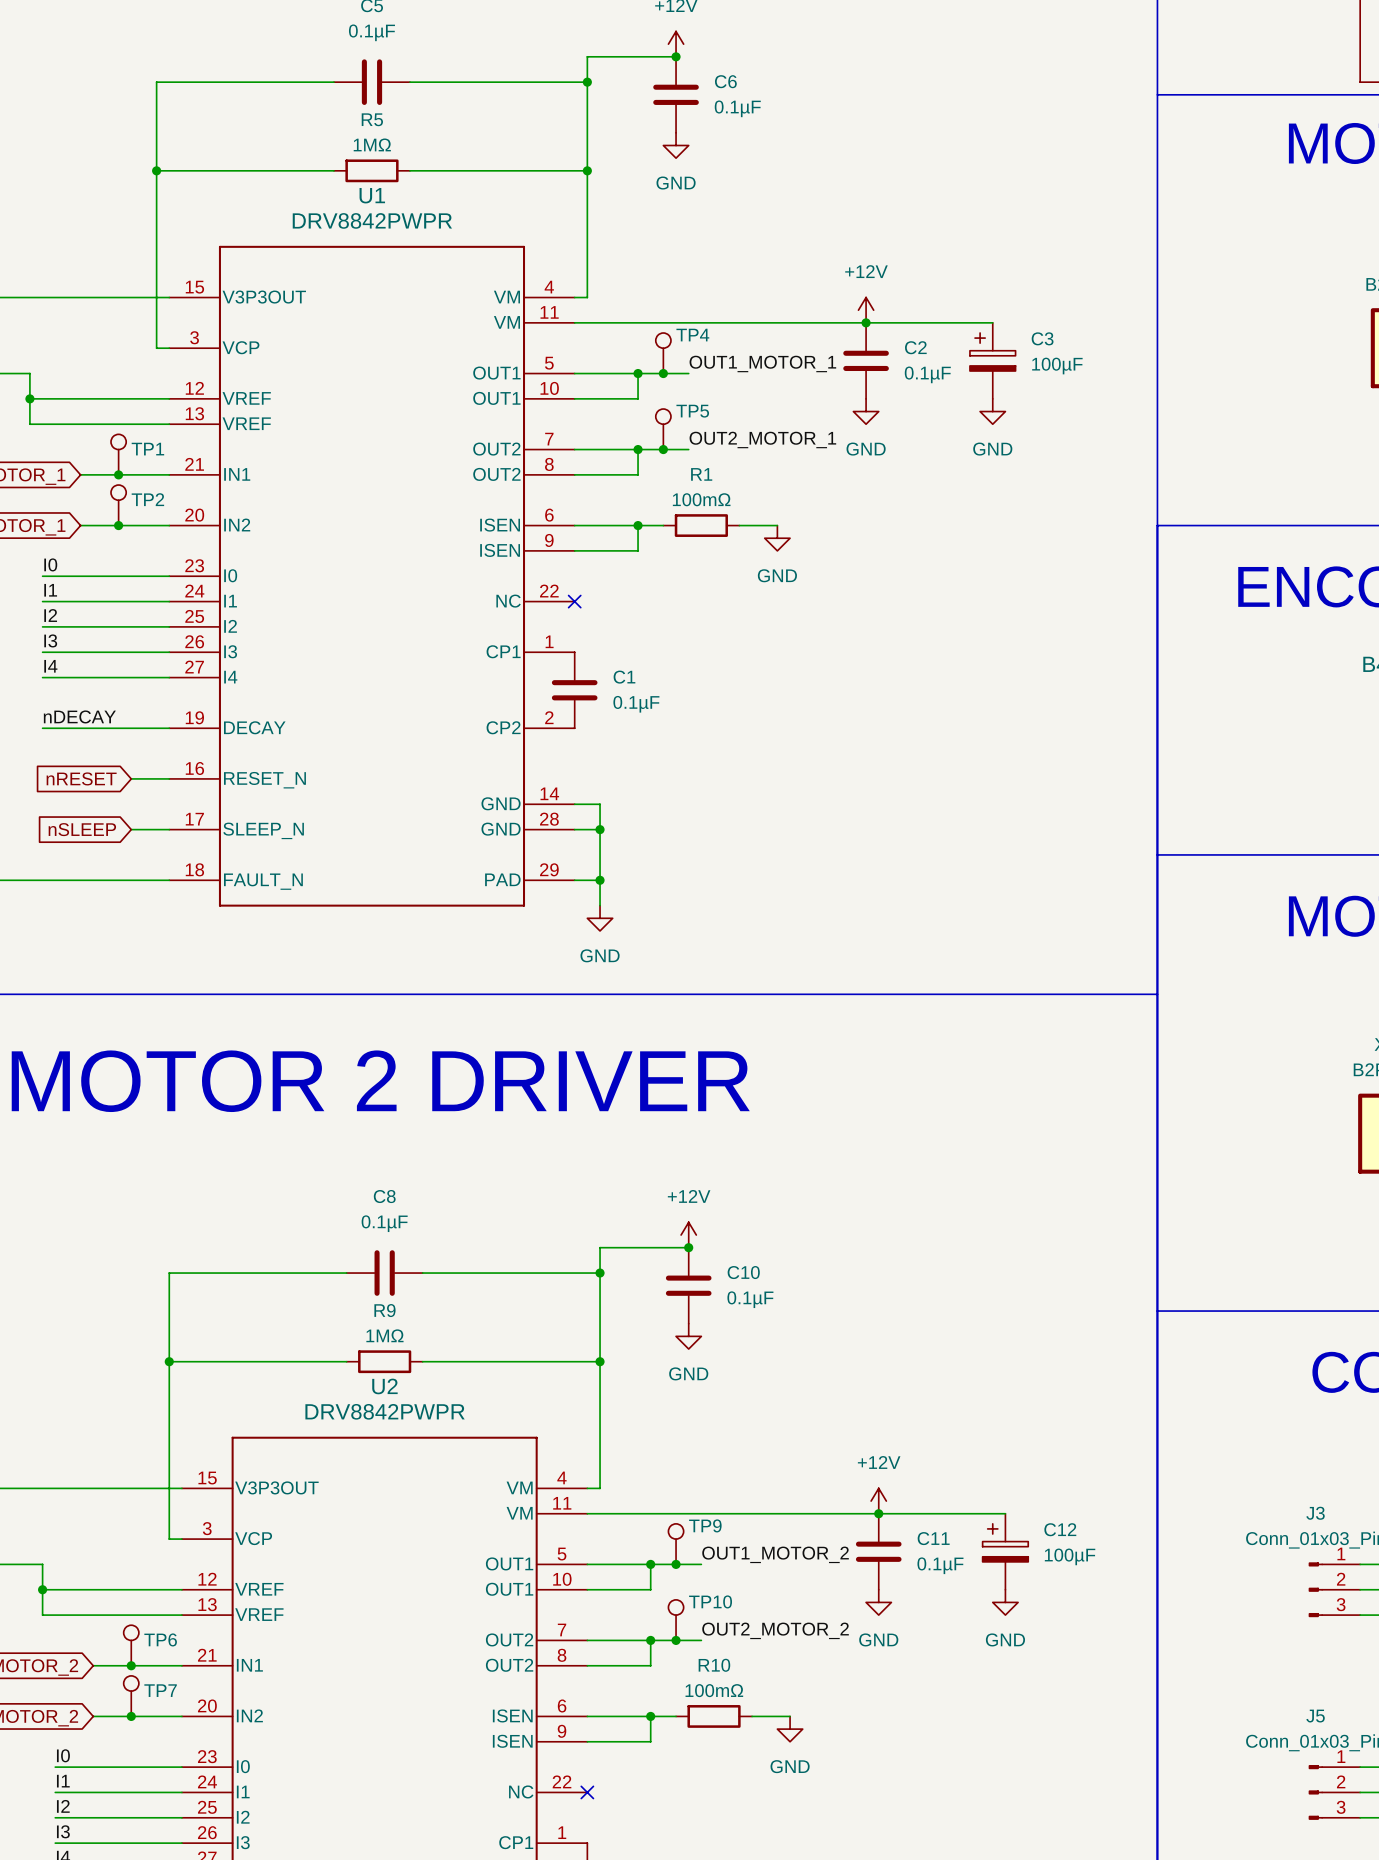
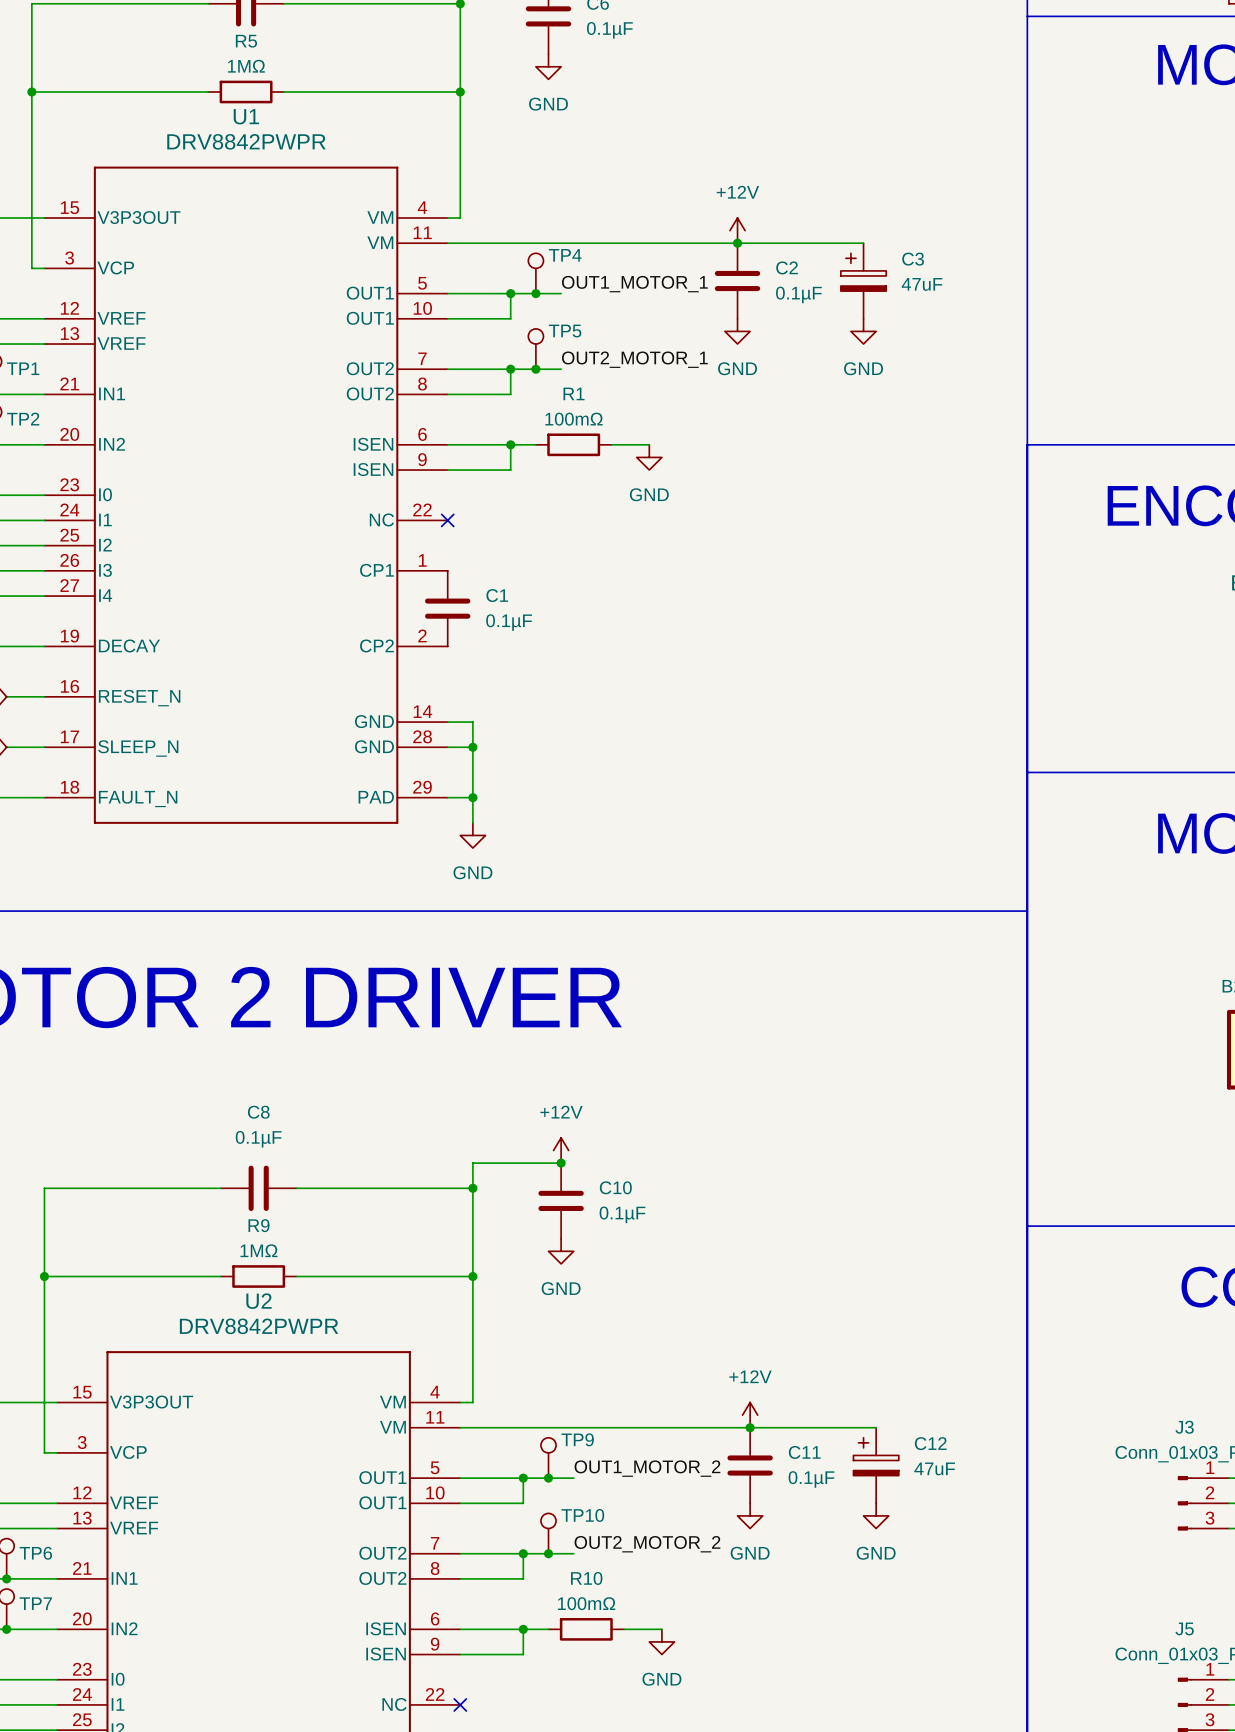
C3 value: 100µF (1057, 366) -> 47uF (922, 284)
C12 value: 100µF (1070, 1556) -> 47uF (934, 1468)

